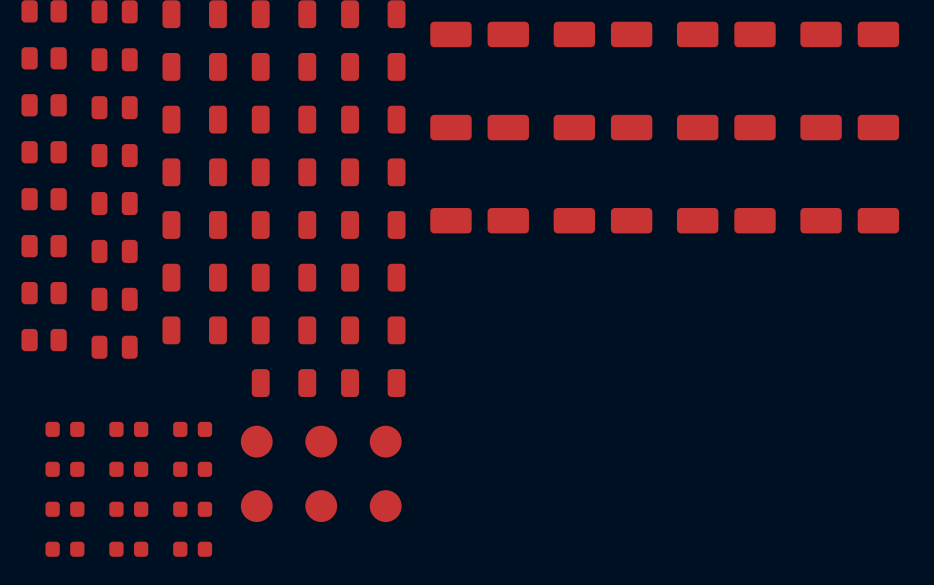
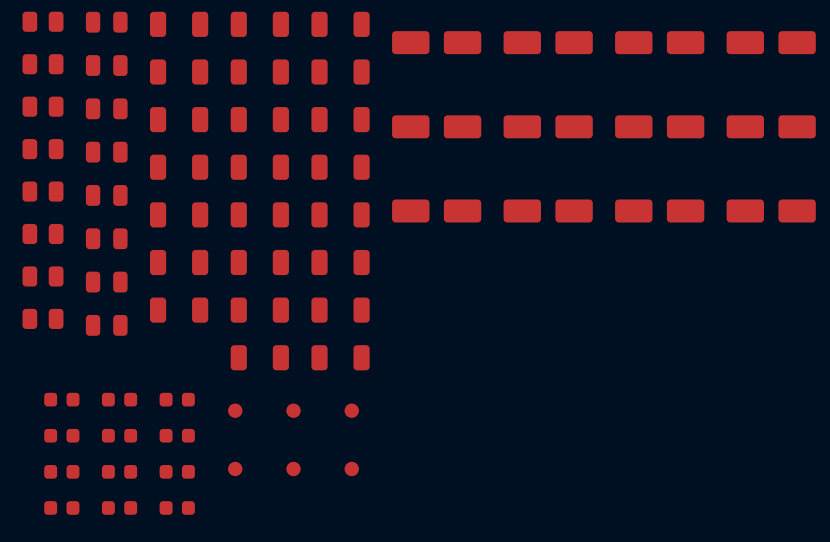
part footprint: [240, 425, 273, 458] -> [228, 403, 243, 418]
part footprint: [305, 425, 338, 458] -> [286, 403, 301, 418]
part footprint: [369, 425, 402, 458] -> [344, 403, 359, 418]
part footprint: [240, 490, 273, 523] -> [228, 461, 243, 477]
part footprint: [305, 490, 338, 523] -> [286, 461, 301, 477]
part footprint: [369, 490, 402, 523] -> [344, 461, 359, 477]

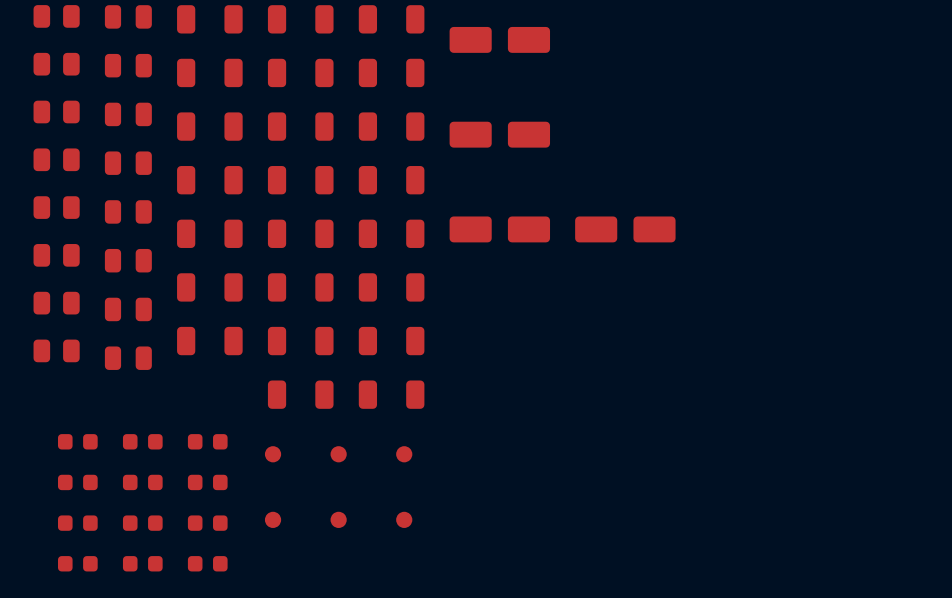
part: (548, 42) -> none
part: (659, 42) -> none
part: (771, 42) -> none
part: (548, 126) -> none
part: (659, 126) -> none
part: (771, 126) -> none
part: (659, 210) -> none
part: (771, 210) -> none

